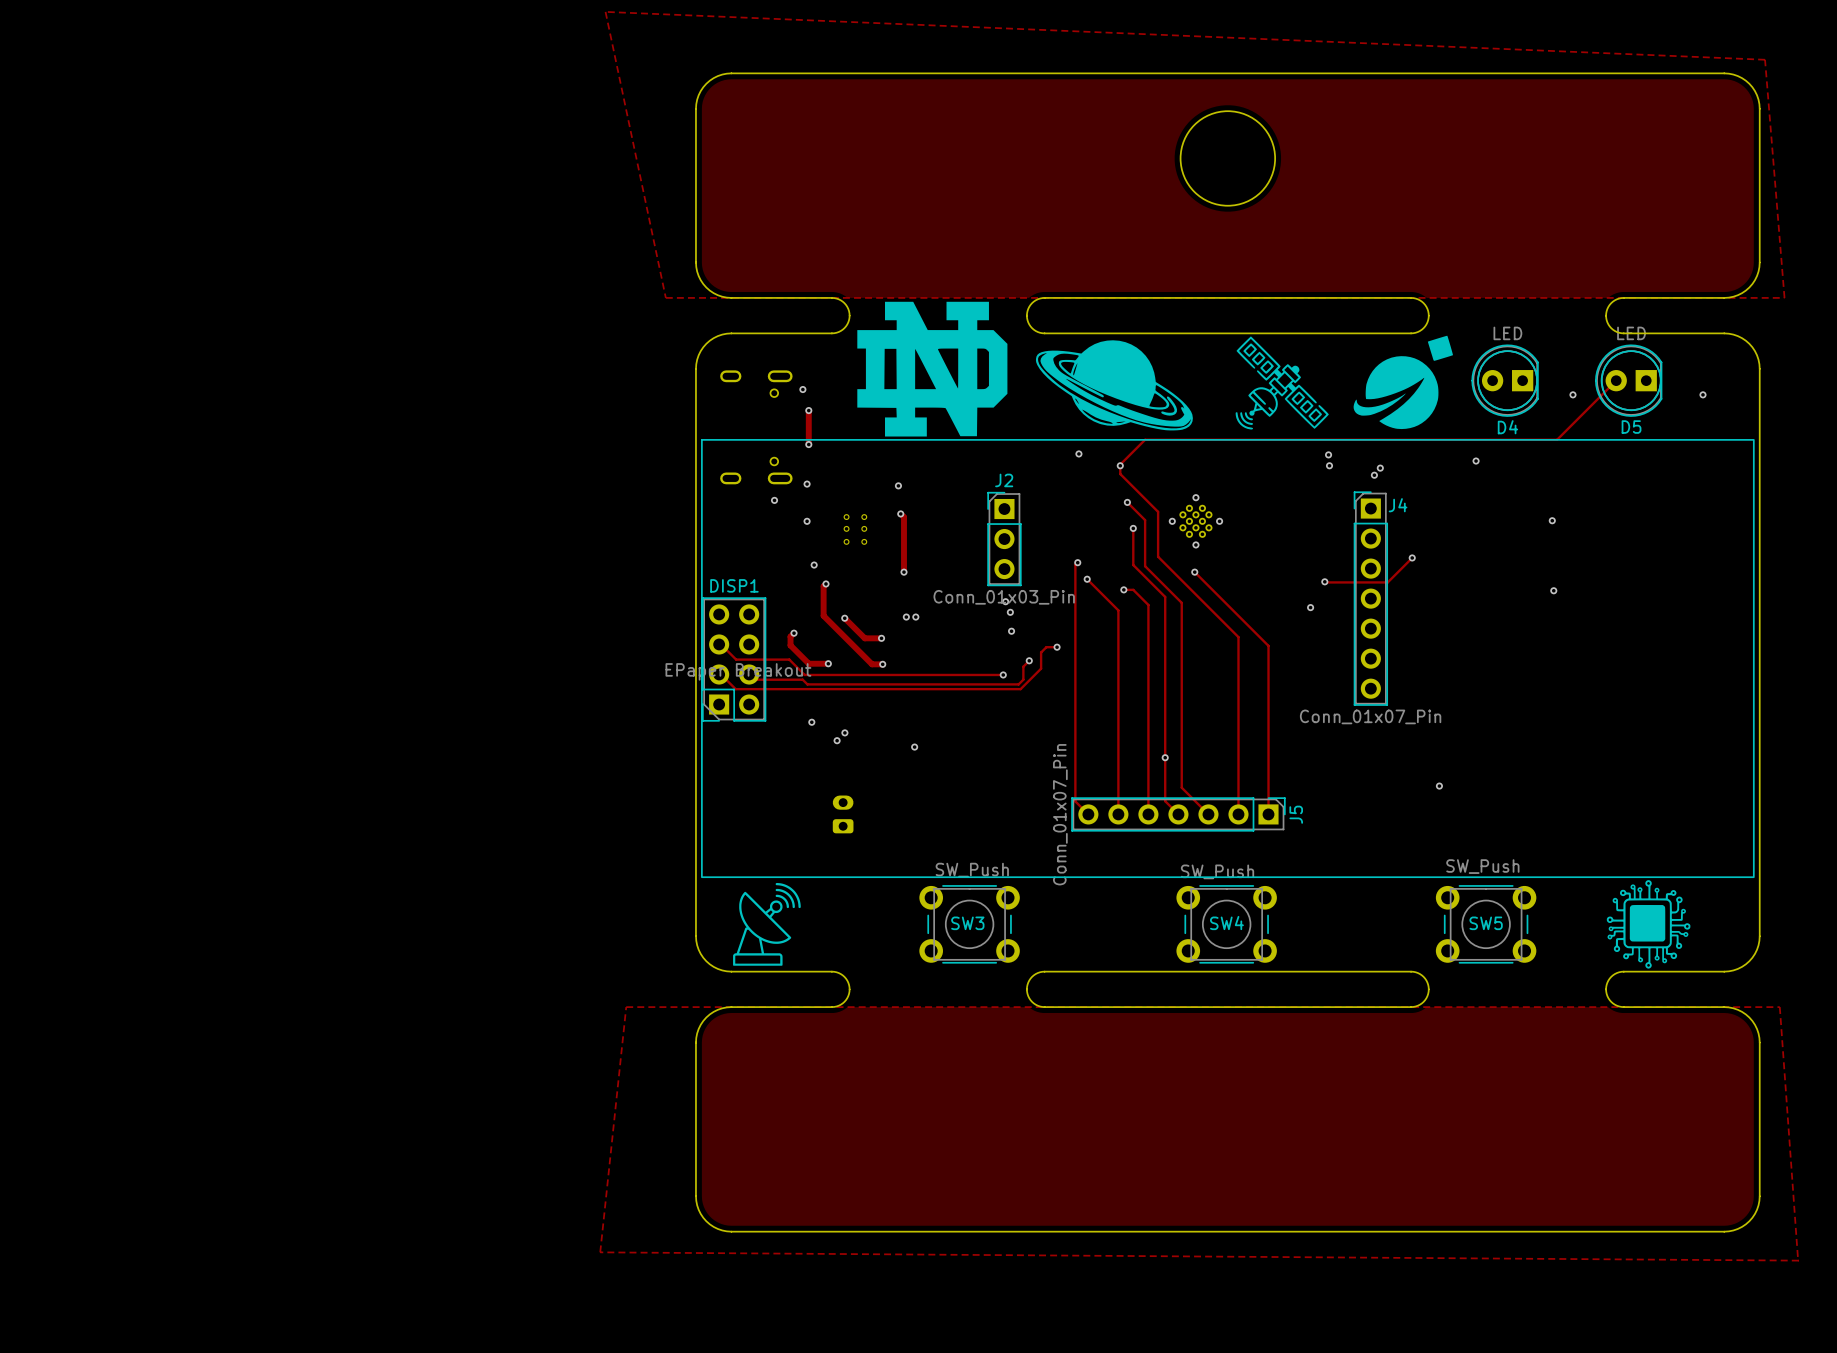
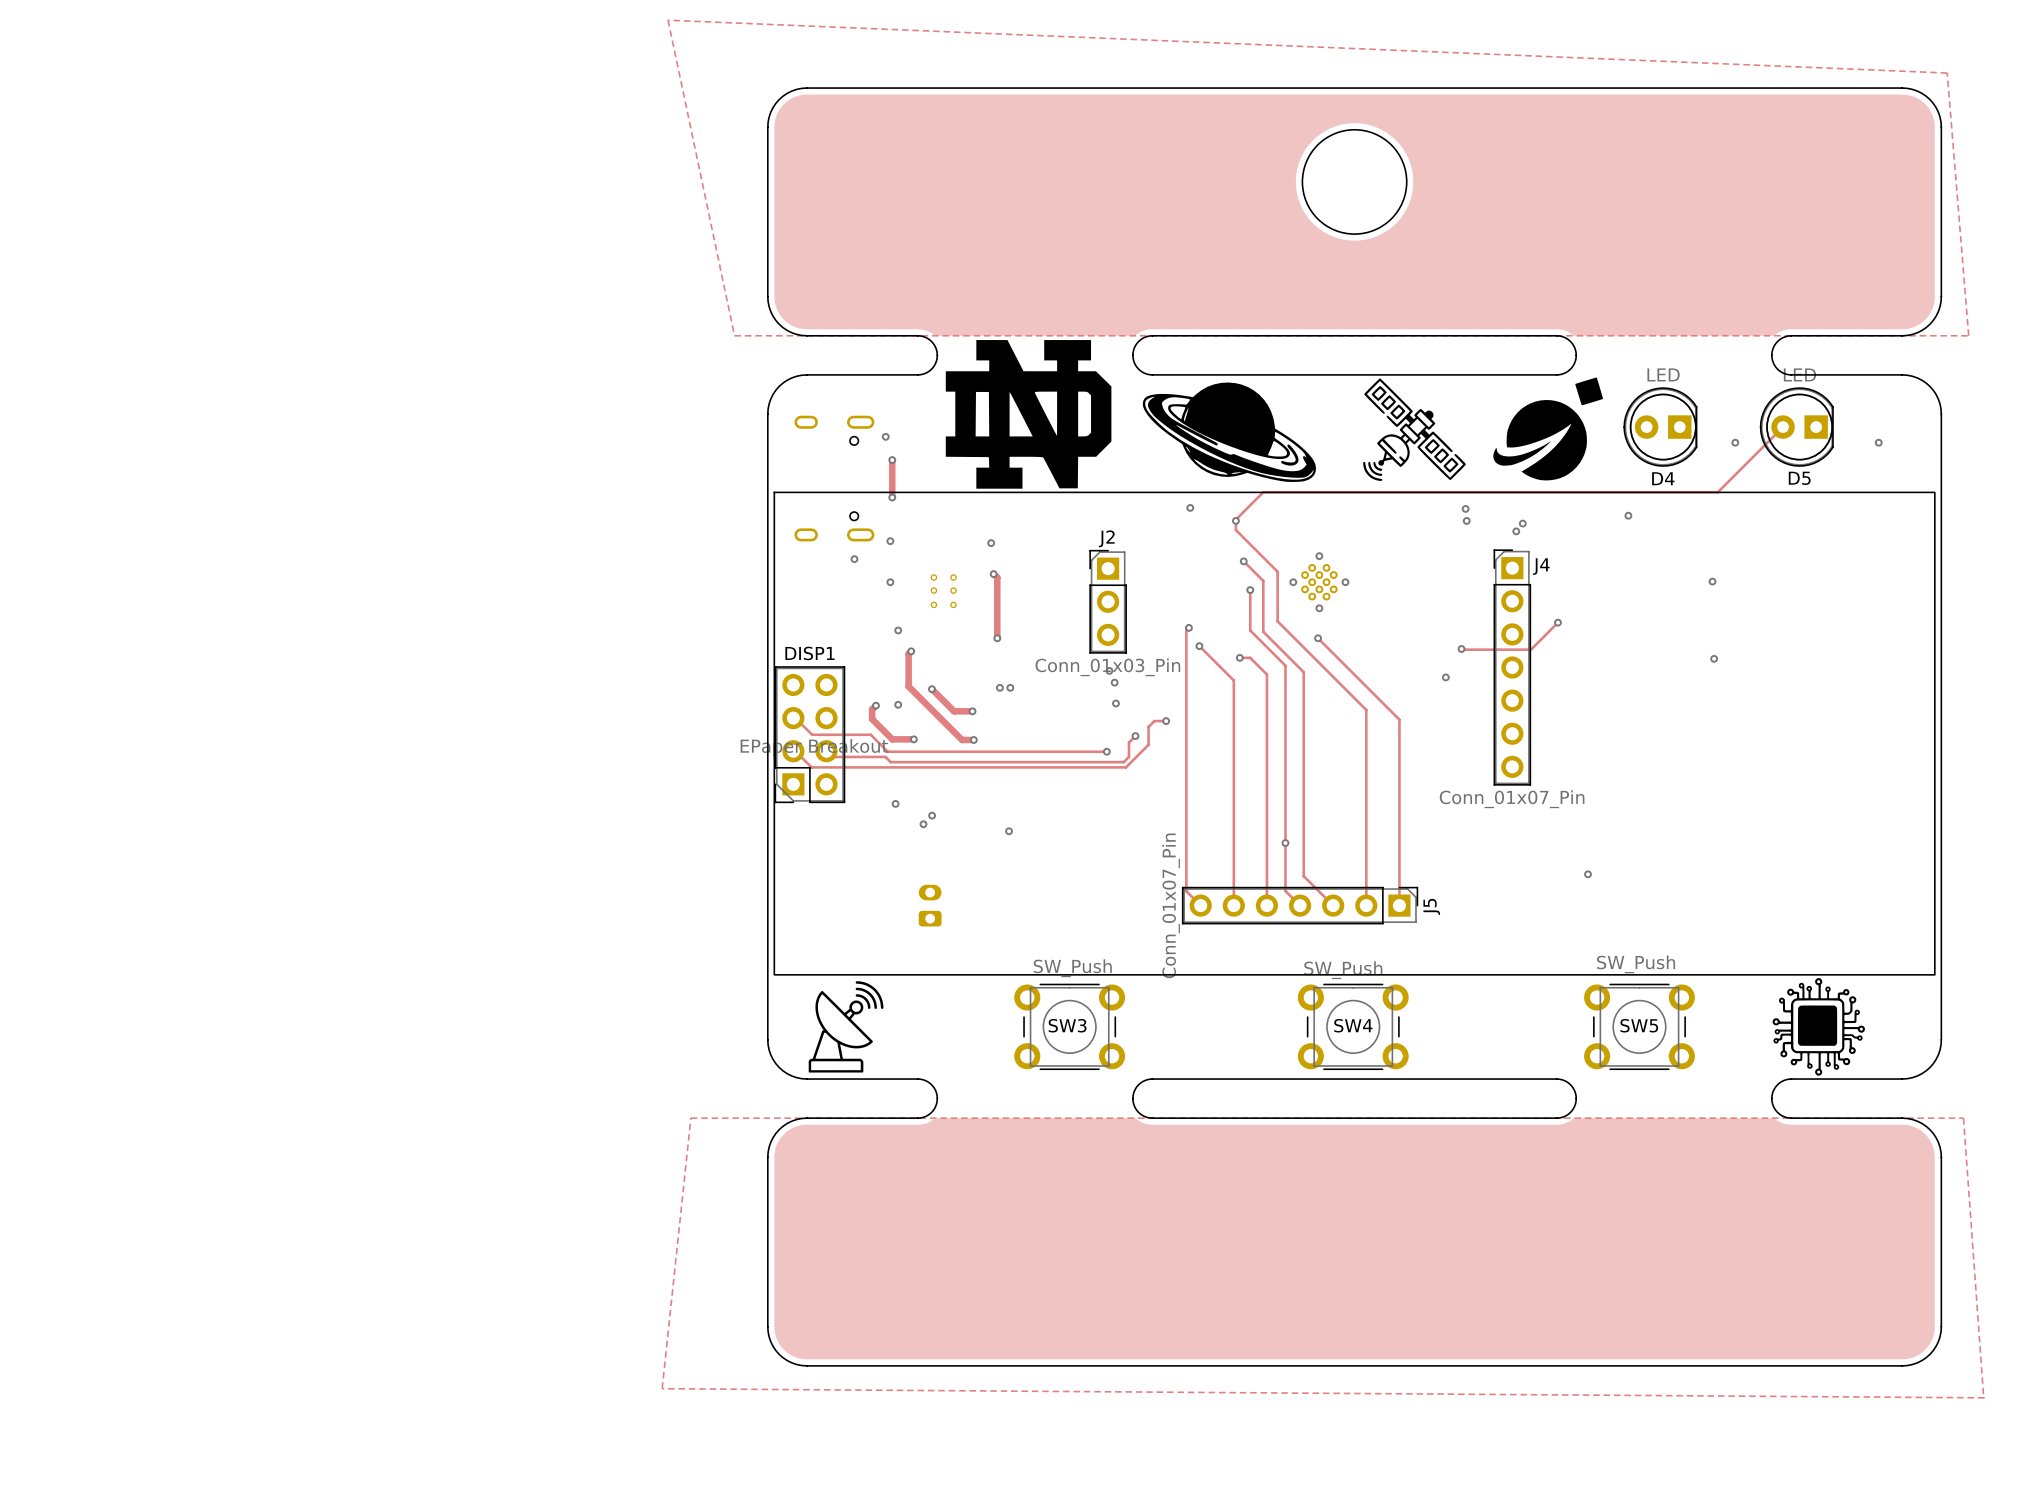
via: none -> (898, 704)

